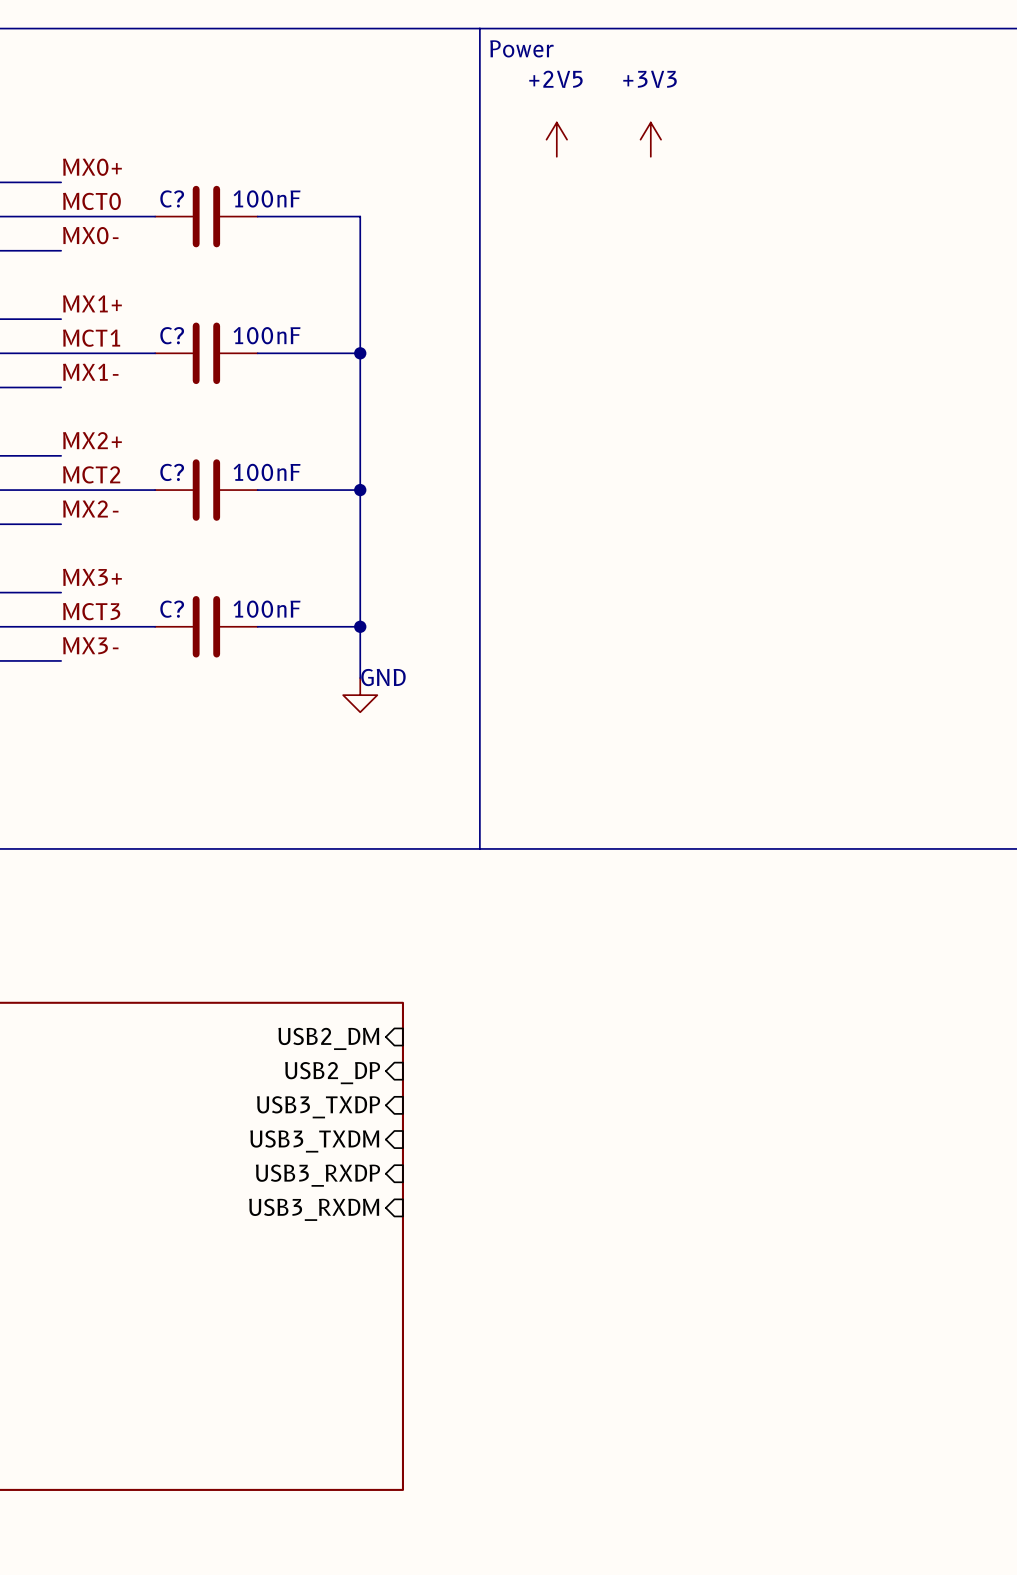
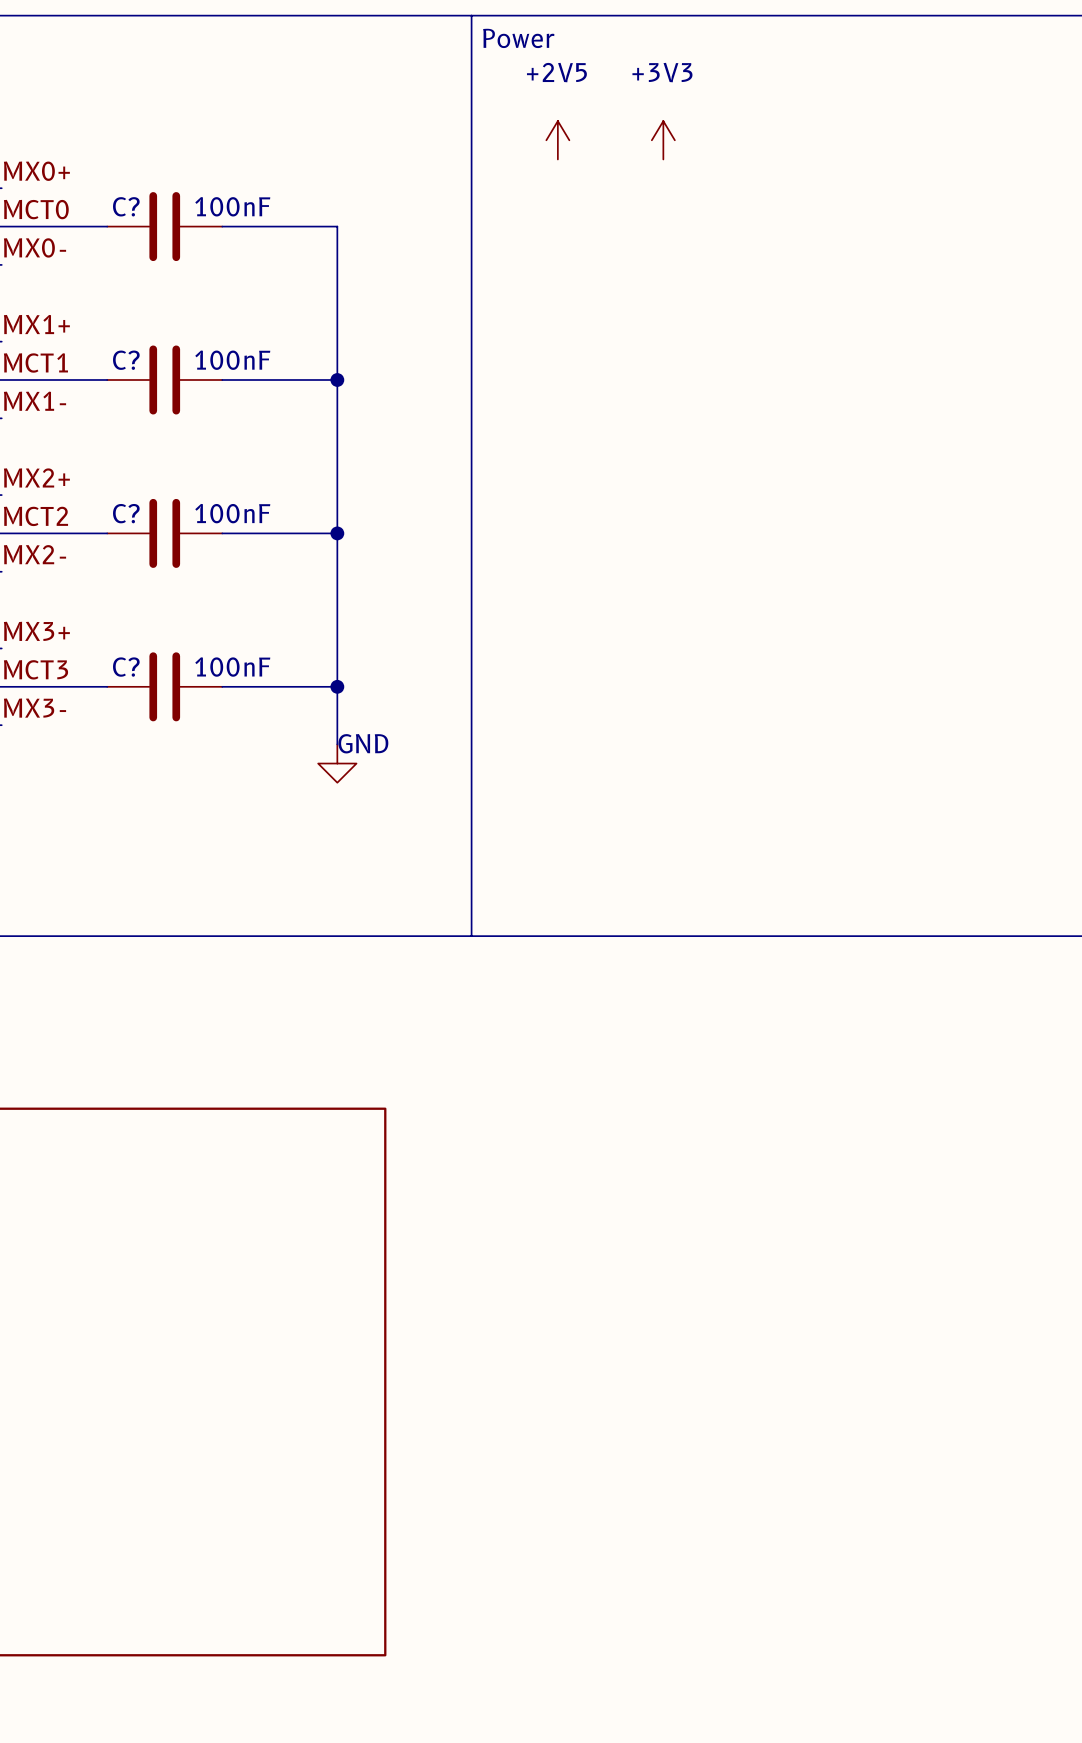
sheet pin: USB2_DM (328, 1038) -> none
sheet pin: USB2_DP (332, 1073) -> none
sheet pin: USB3_TXDP (318, 1107) -> none
sheet pin: USB3_TXDM (314, 1141) -> none
sheet pin: USB3_RXDP (317, 1175) -> none
sheet pin: USB3_RXDM (314, 1209) -> none

